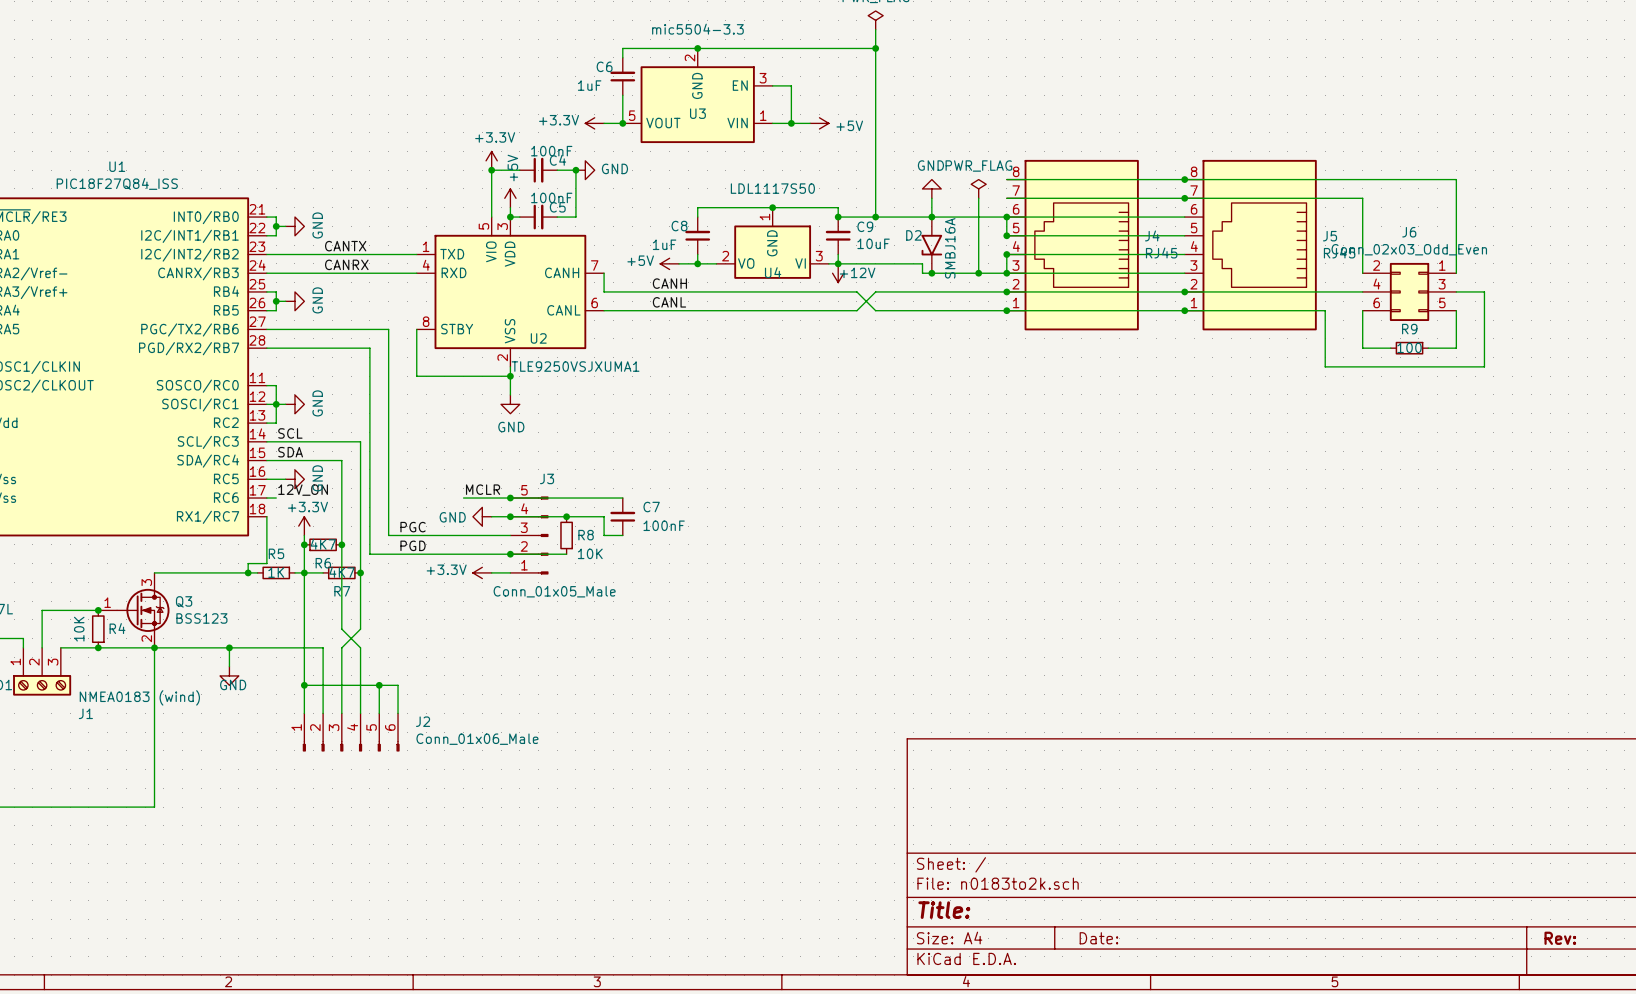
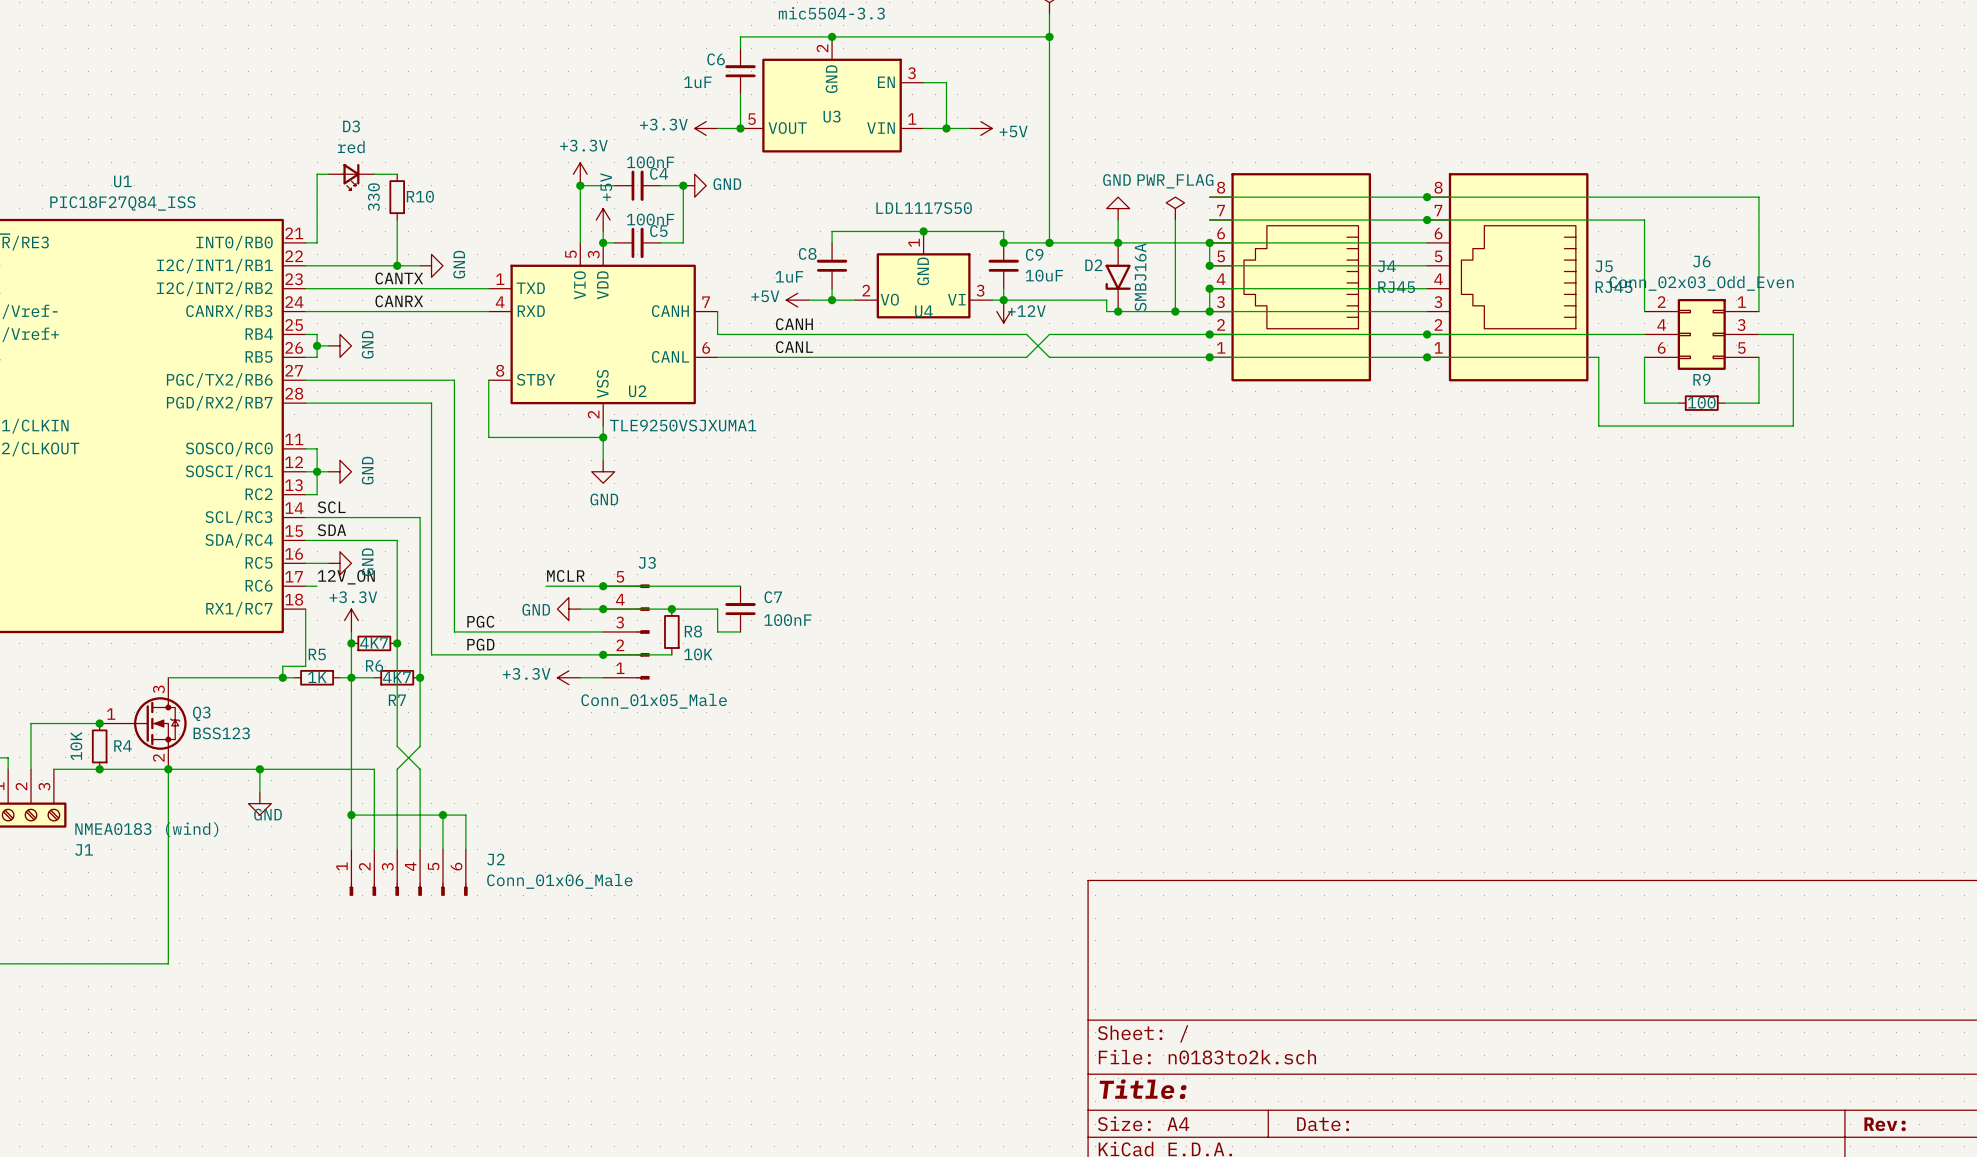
wire: none -> (374, 174) (397, 174)
D3: none -> red (351, 177)
R10: none -> 330 (397, 197)
wire: none -> (397, 220) (397, 265)
wire: (276, 217) (276, 235) -> (317, 242) (317, 174) (328, 174)
wire: (276, 226) (285, 226) -> none
junction: (276, 226) -> none
power symbol position: GND (294, 226) -> GND (431, 265)
wire: none -> (317, 265) (420, 265)
junction: none -> (397, 265)

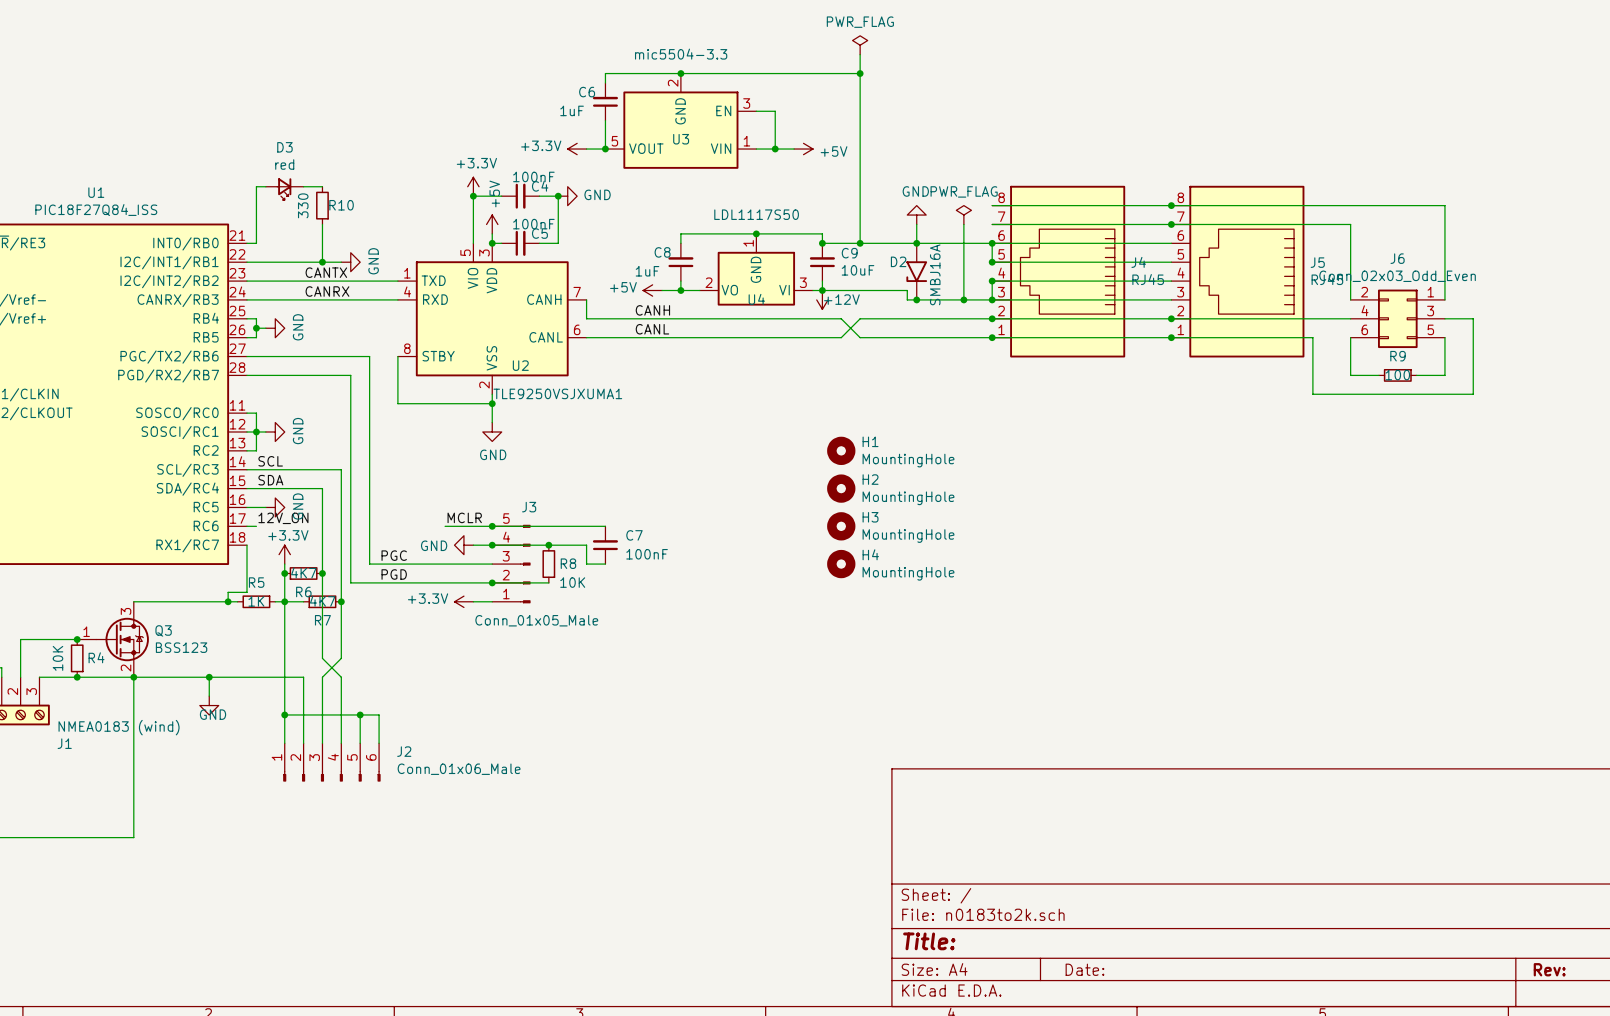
H1: none -> MountingHole (841, 450)
H2: none -> MountingHole (841, 488)
H3: none -> MountingHole (841, 526)
H4: none -> MountingHole (841, 564)

